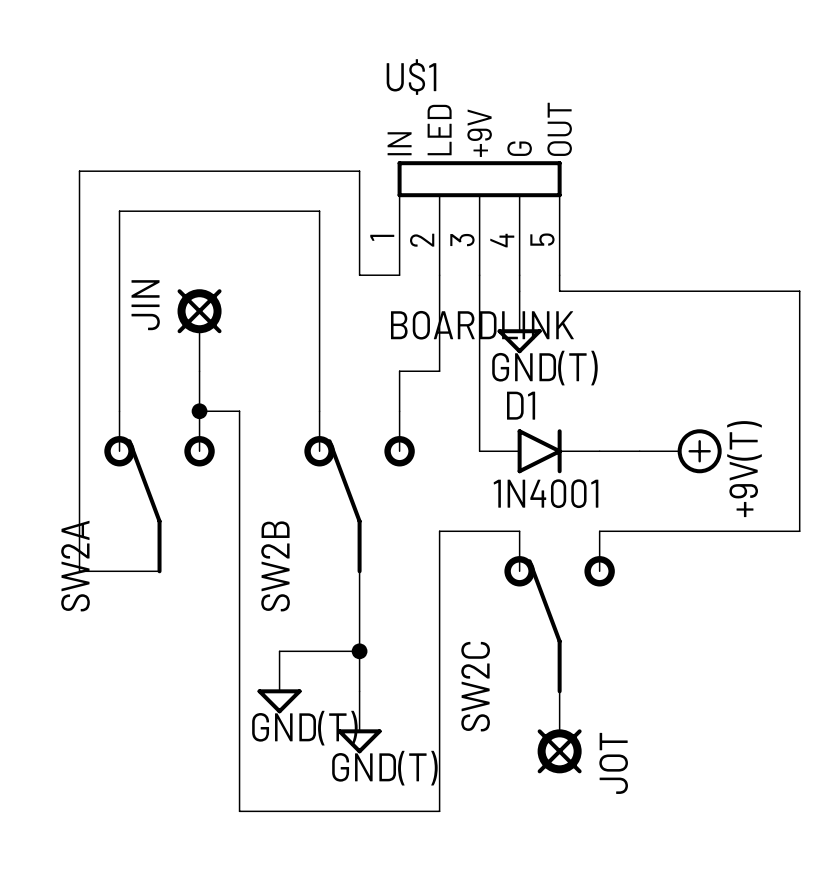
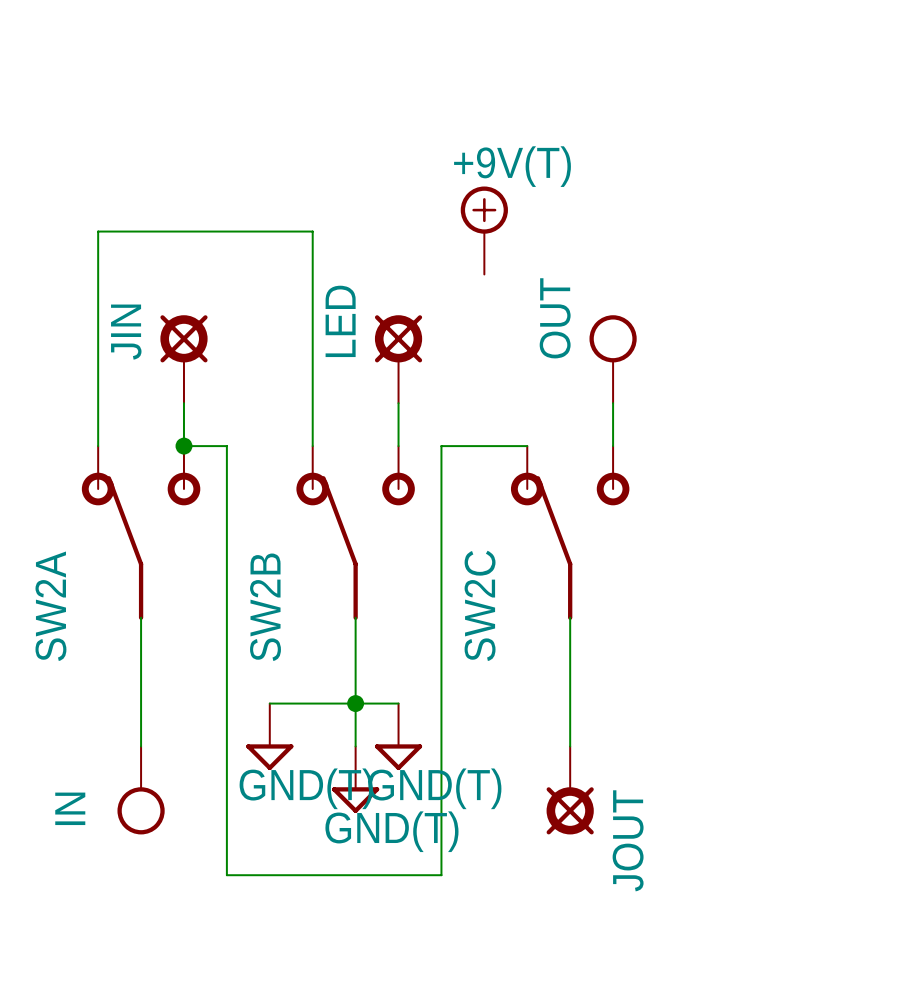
U$1: BOARDLINK (479, 218) -> none
wire: (399, 275) (359, 275) (359, 171) (79, 171) (79, 571) (159, 571) -> (141, 746) (141, 617)
wire: (439, 275) (439, 371) (399, 371) -> none
wire: (479, 275) (479, 451) -> none
wire: (519, 275) (519, 291) -> none
wire: (559, 275) (559, 291) (799, 291) (799, 531) (599, 531) -> none
part position: (519, 322) -> (398, 736)
LED: none -> (398, 359)
OUT: none -> (613, 359)
wire: none -> (613, 403) (613, 446)
D1: 1N4001 (539, 451) -> none
wire: (599, 451) (639, 451) -> (355, 703) (398, 703)
part position: (680, 451) -> (484, 230)
part rotation: 0° (699, 451) -> 90° counterclockwise (484, 210)
wire: (439, 531) (519, 531) -> (441, 574) (441, 446) (527, 446)
wire: none -> (570, 617) (570, 746)
SW2C position: (559, 612) -> (570, 532)
IN: none -> (141, 790)
JOT name: JOT (613, 763) -> JOUT (628, 840)

